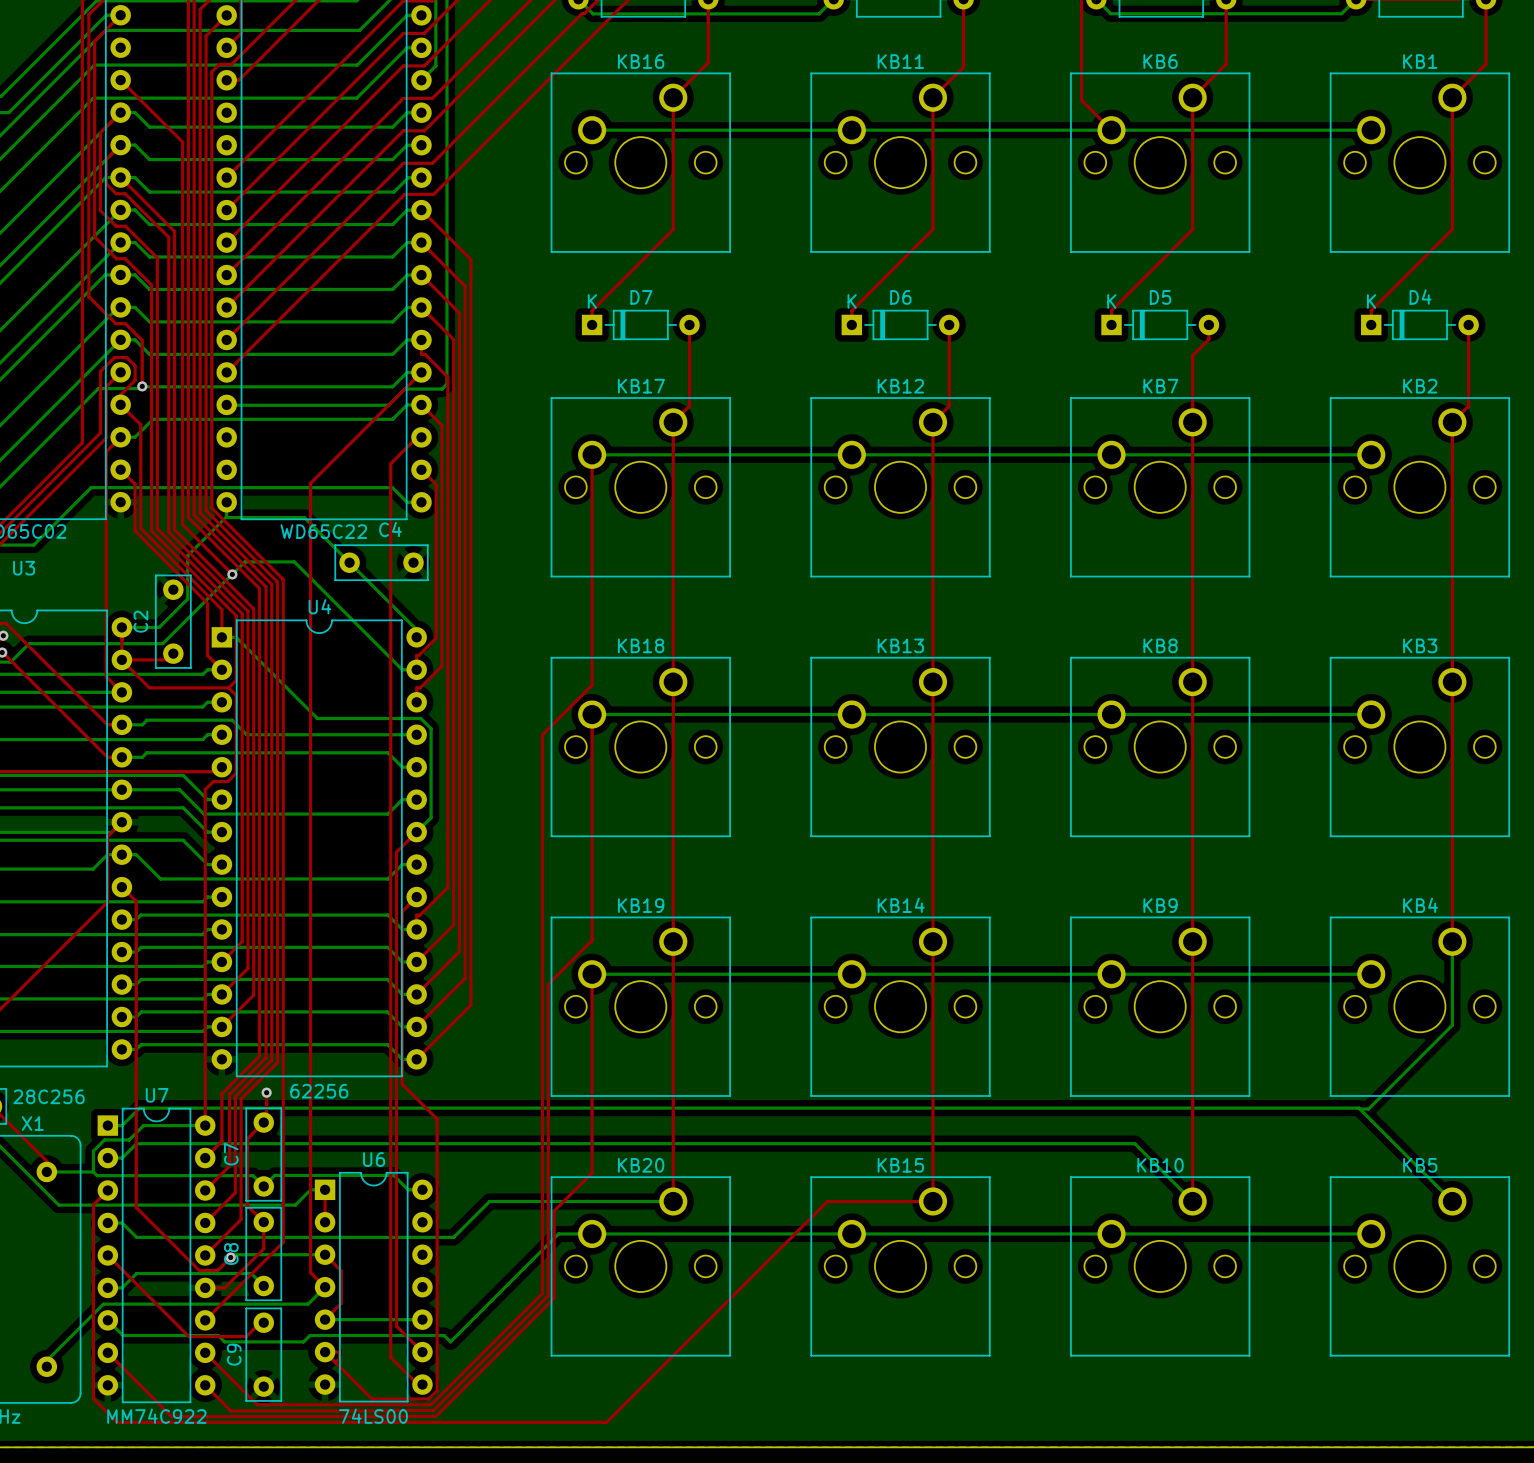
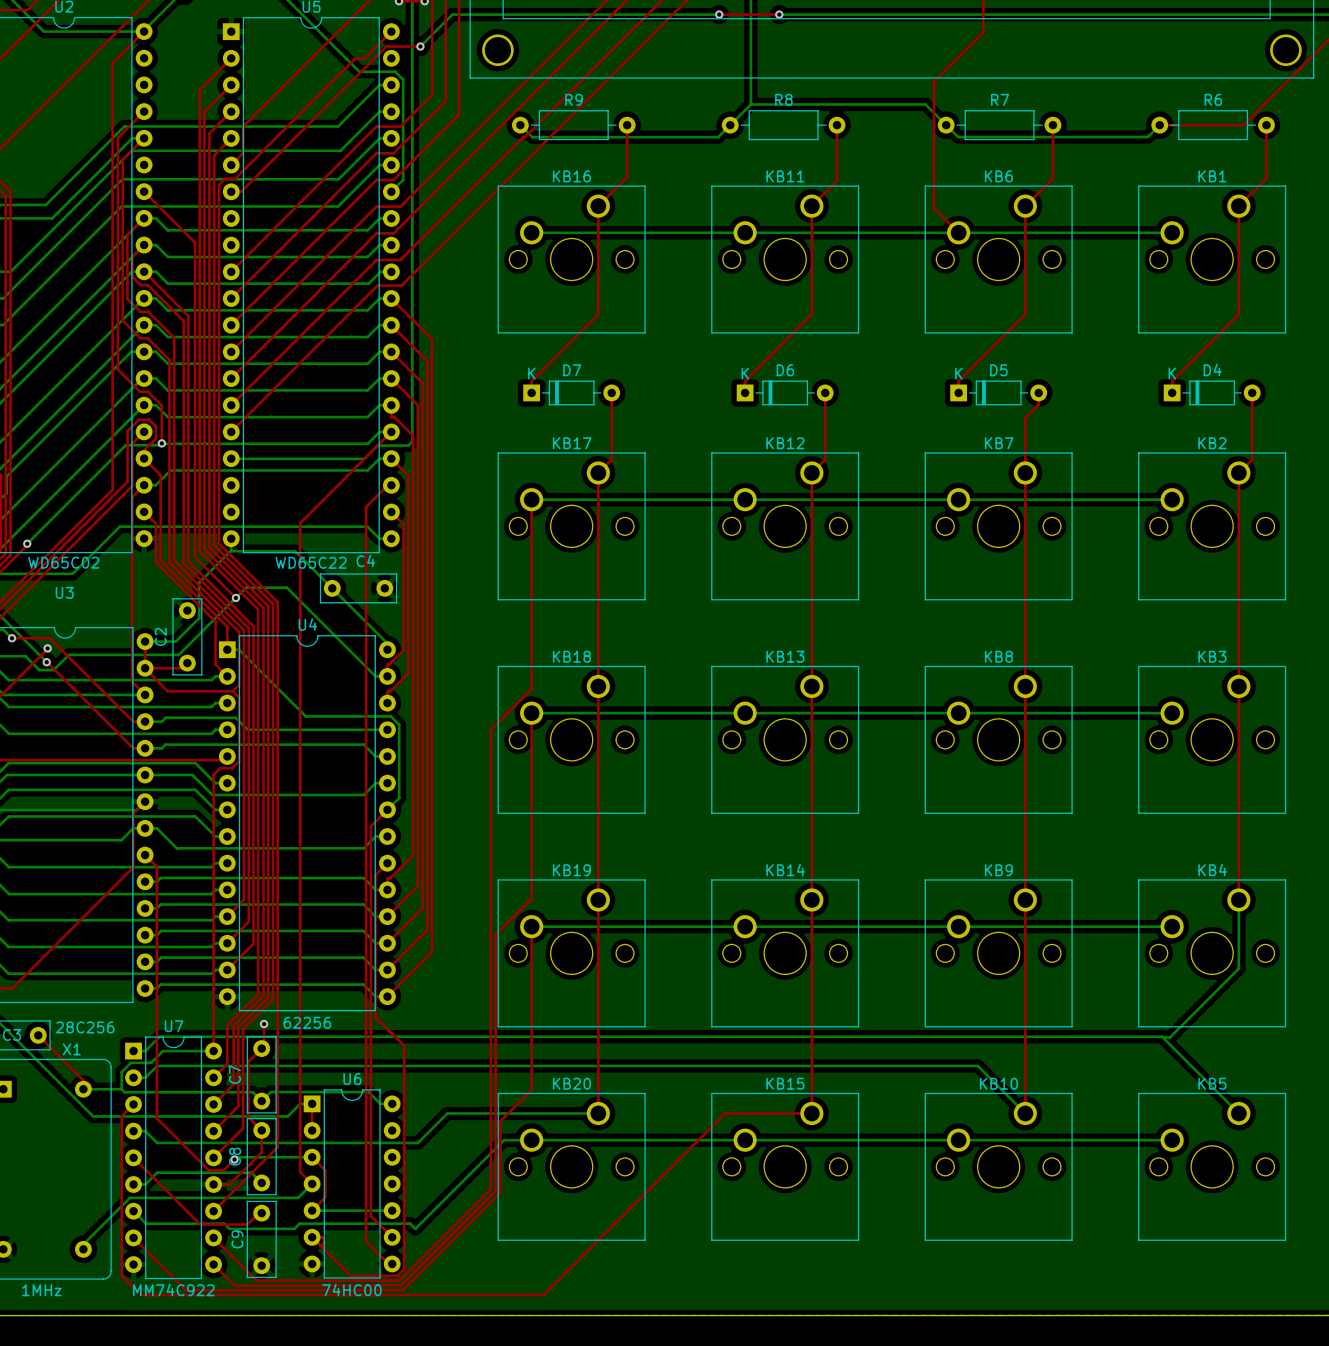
U6 value: 74LS00 (373, 1416) -> 74HC00 (351, 1289)

